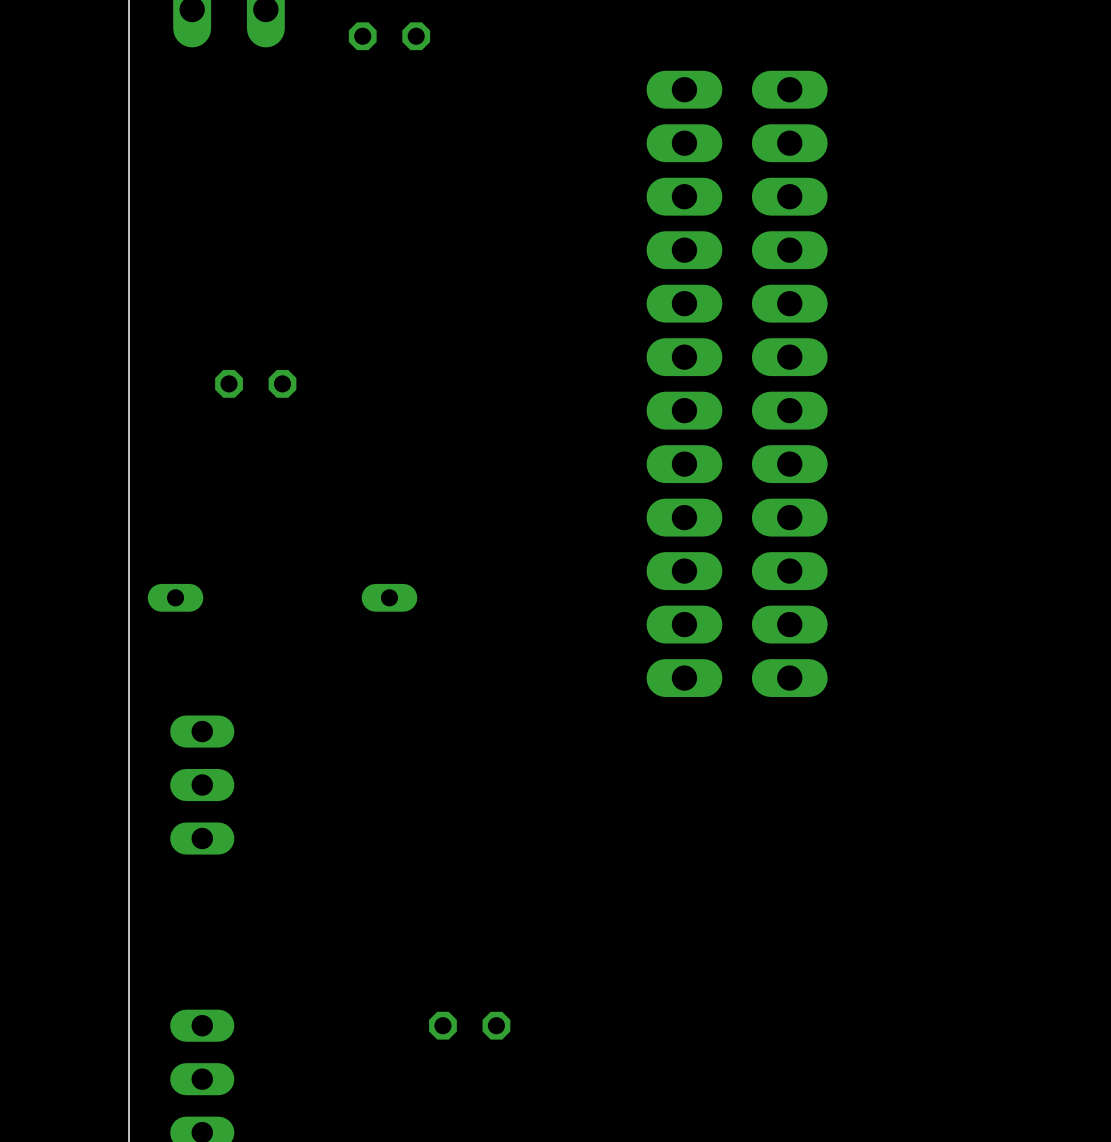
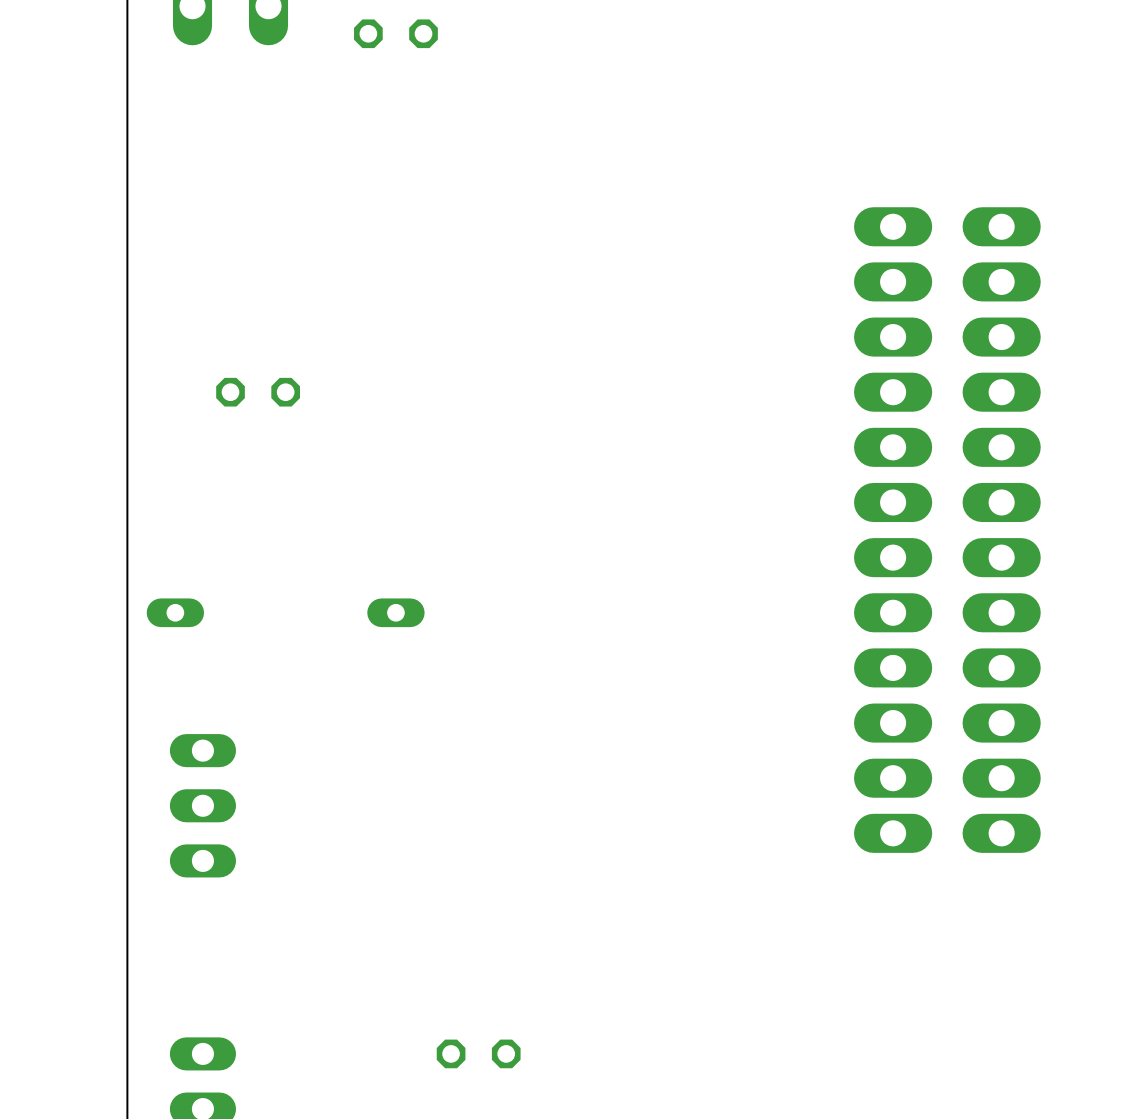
part position: (737, 383) -> (947, 530)

